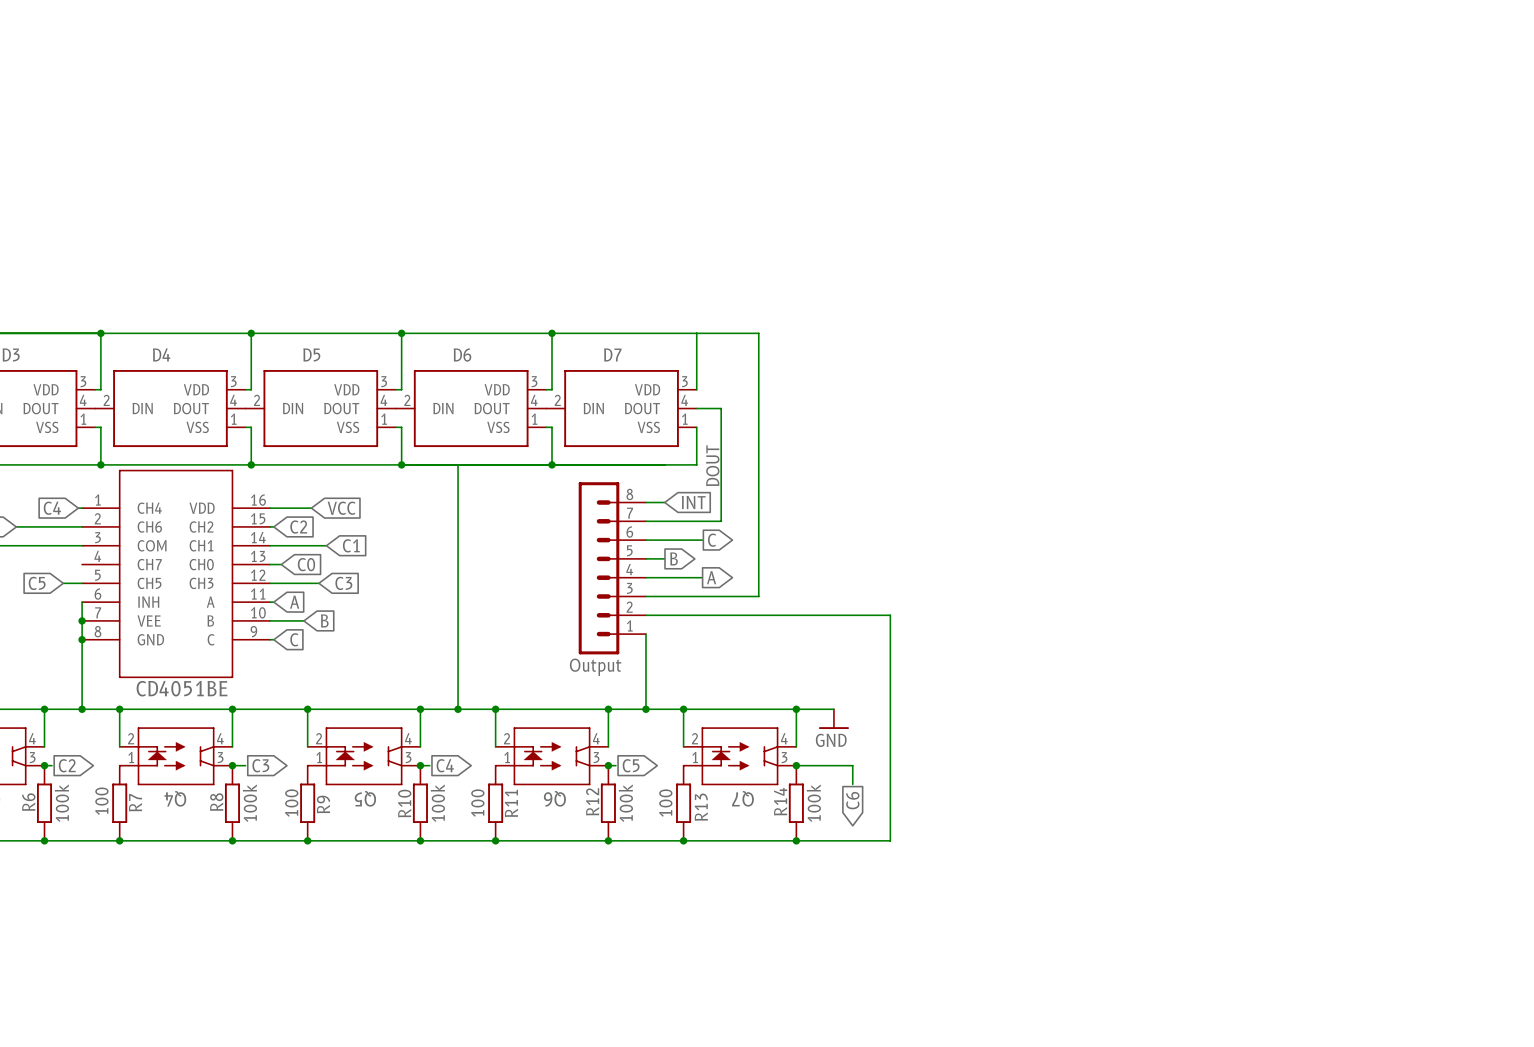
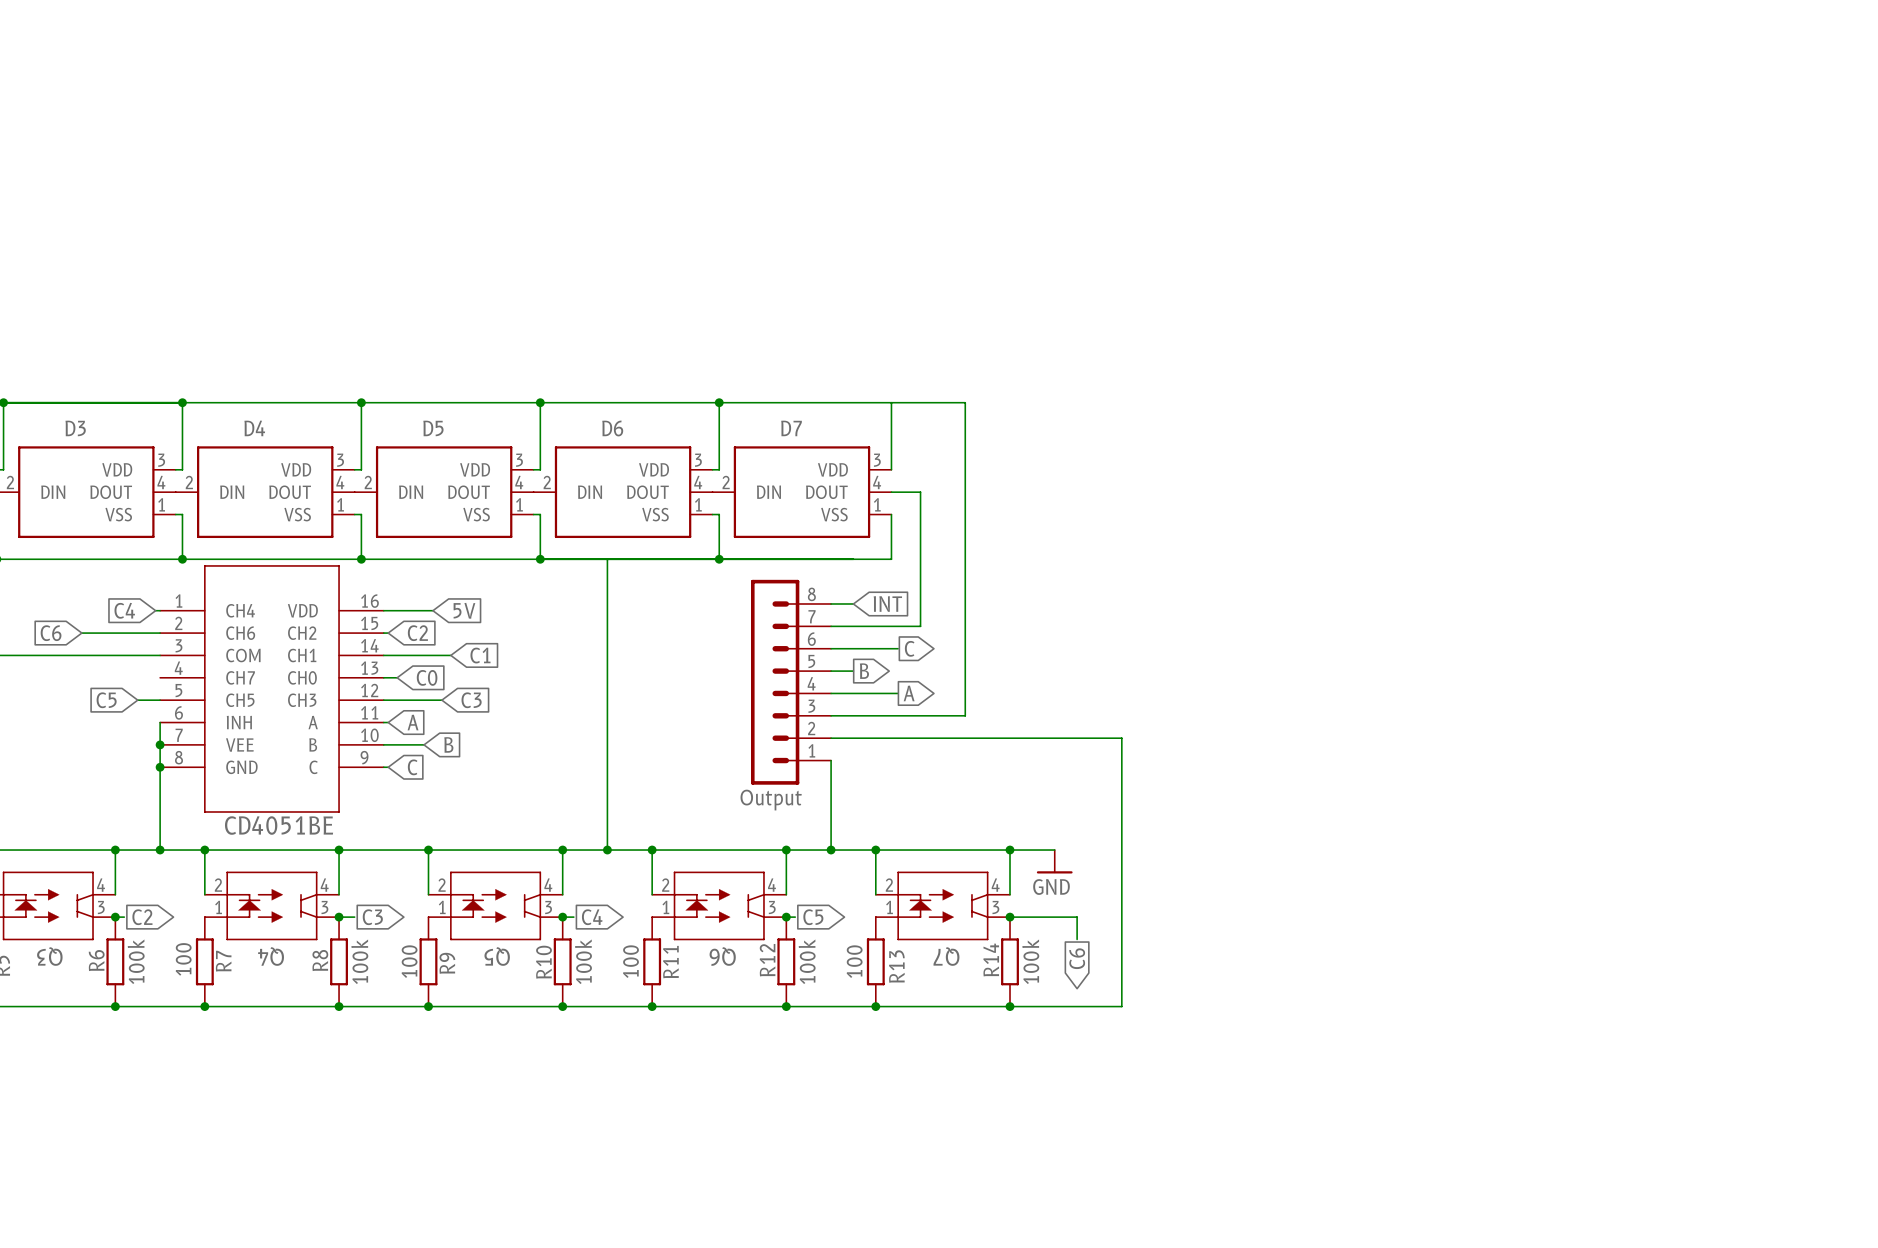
label: DOUT (712, 465) -> none
global label: VCC (341, 508) -> 5V (464, 610)

